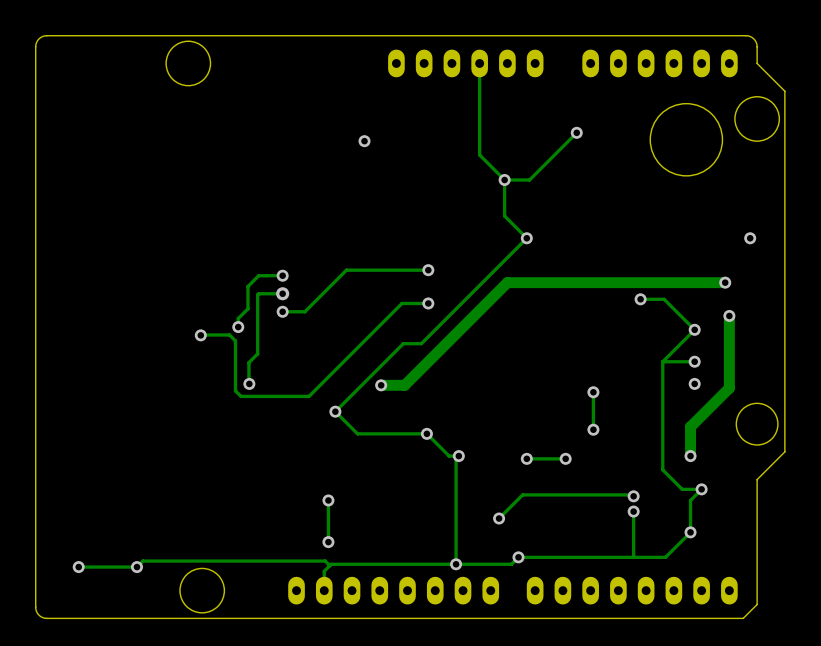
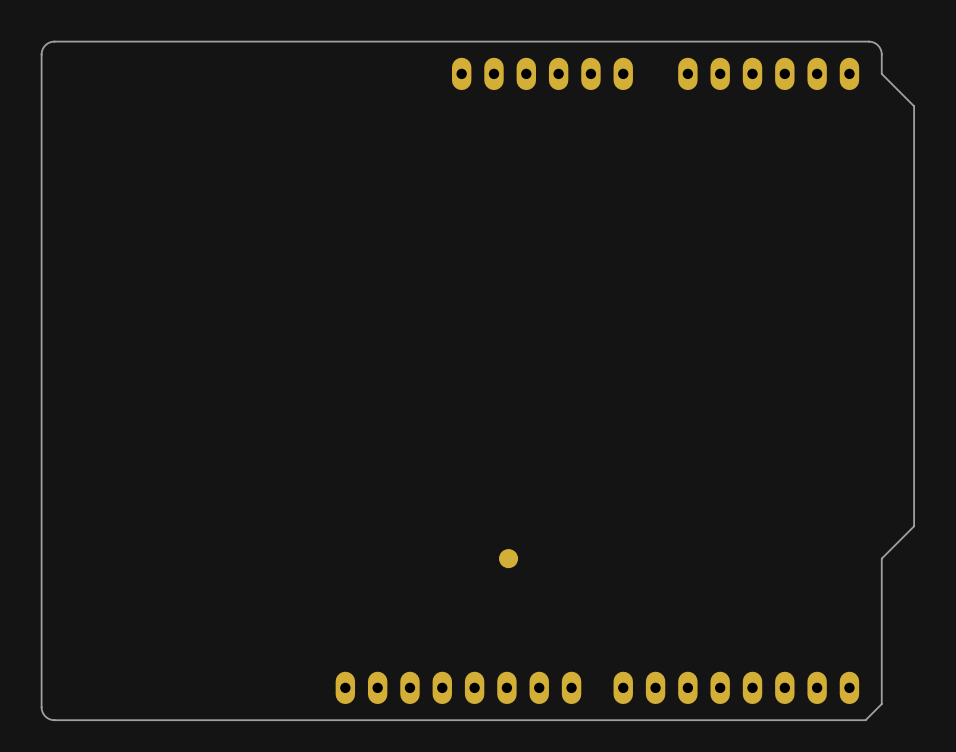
round board edge: [165, 40, 212, 87] -> none
track: (479, 63) (479, 155) (504, 179) -> none
round board edge: [734, 96, 780, 142] -> none
round board edge: [649, 103, 724, 177] -> none
track: (576, 132) (529, 179) (504, 179) -> none
via: (576, 132) -> none
via: (364, 141) -> none
track: (504, 179) (504, 216) (526, 238) (421, 343) (403, 343) (335, 411) (357, 433) (426, 433) (449, 456) (458, 456) (456, 458) (456, 564) -> none
via: (504, 179) -> none
via: (526, 238) -> none
via: (750, 238) -> none
track: (428, 270) (346, 270) (304, 311) (282, 311) -> none
via: (428, 270) -> none
track: (282, 275) (258, 275) (247, 286) (247, 308) (238, 318) (238, 327) -> none
via: (282, 275) -> none
track: (725, 282) (507, 282) (404, 385) (381, 385) (382, 384) -> none
via: (725, 282) -> none
track: (282, 293) (257, 294) (257, 353) (248, 362) (249, 383) -> none
via: (282, 293) -> none
track: (640, 299) (664, 299) (694, 329) (662, 361) -> none
via: (640, 299) -> none
track: (428, 303) (401, 303) (309, 396) (241, 396) (235, 390) (235, 340) (229, 334) (200, 335) -> none
via: (428, 303) -> none
via: (282, 311) -> none
track: (727, 315) (729, 315) (729, 388) (690, 426) (690, 456) -> none
via: (729, 315) -> none
via: (238, 327) -> none
via: (694, 329) -> none
via: (200, 335) -> none
track: (662, 361) (662, 469) (682, 489) (701, 489) (690, 500) (690, 532) (665, 557) (518, 557) (511, 564) (331, 564) (324, 571) (324, 590) -> none
track: (694, 361) (662, 361) -> none
via: (694, 361) -> none
via: (249, 383) -> none
via: (694, 383) -> none
via: (381, 385) -> none
track: (593, 392) (593, 429) -> none
via: (593, 392) -> none
round board edge: [735, 402, 779, 446] -> none
via: (335, 411) -> none
via: (593, 429) -> none
via: (426, 433) -> none
via: (458, 456) -> none
via: (690, 456) -> none
via: (526, 458) -> none
track: (565, 458) (526, 458) -> none
via: (565, 458) -> none
part: none -> (508, 558)
via: (701, 489) -> none
track: (633, 496) (522, 494) (499, 518) -> none
via: (633, 496) -> none
track: (328, 500) (328, 542) -> none
via: (328, 500) -> none
track: (633, 511) (633, 557) -> none
via: (633, 511) -> none
via: (499, 518) -> none
via: (690, 532) -> none
via: (328, 542) -> none
via: (518, 557) -> none
via: (456, 564) -> none
track: (329, 565) (325, 561) (142, 561) (136, 567) (78, 567) -> none
via: (78, 567) -> none
via: (136, 567) -> none
round board edge: [179, 567, 225, 614] -> none

